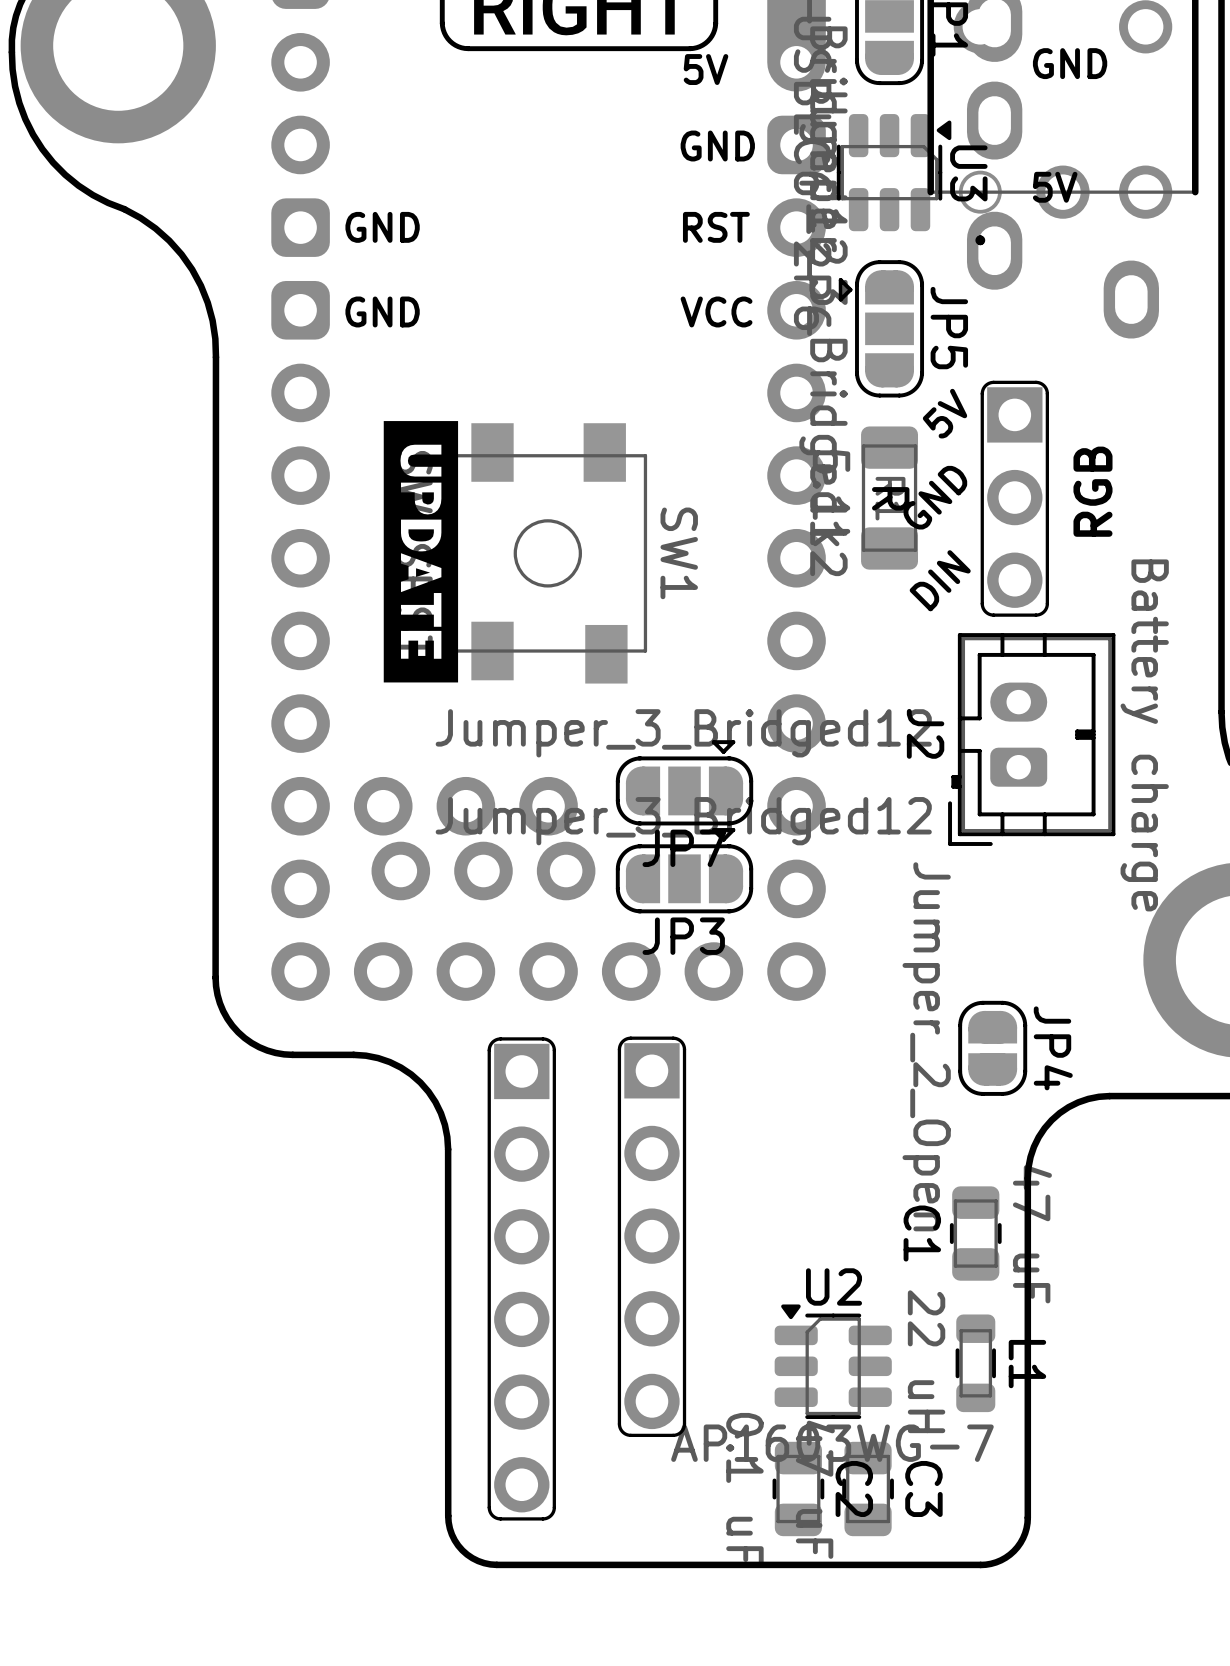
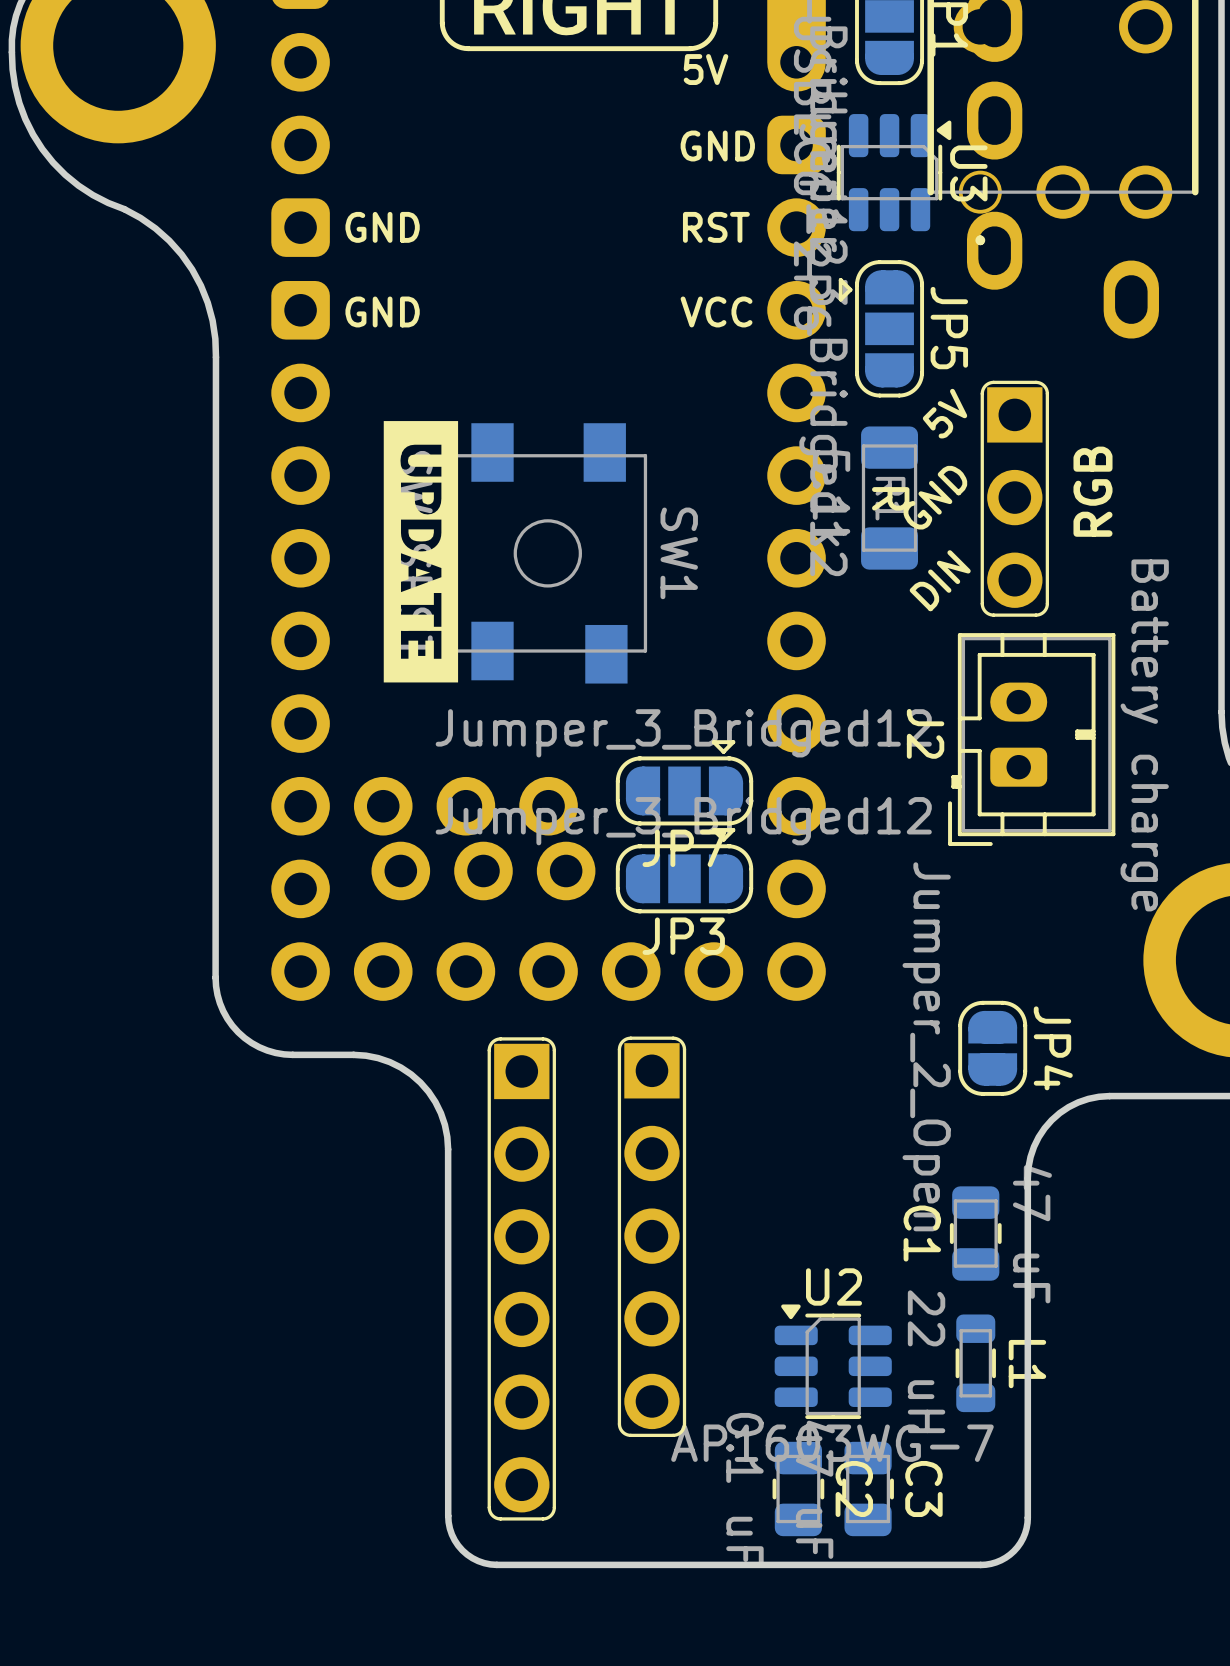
text: GND (1070, 63) -> none
text: 5V (1055, 187) -> none

